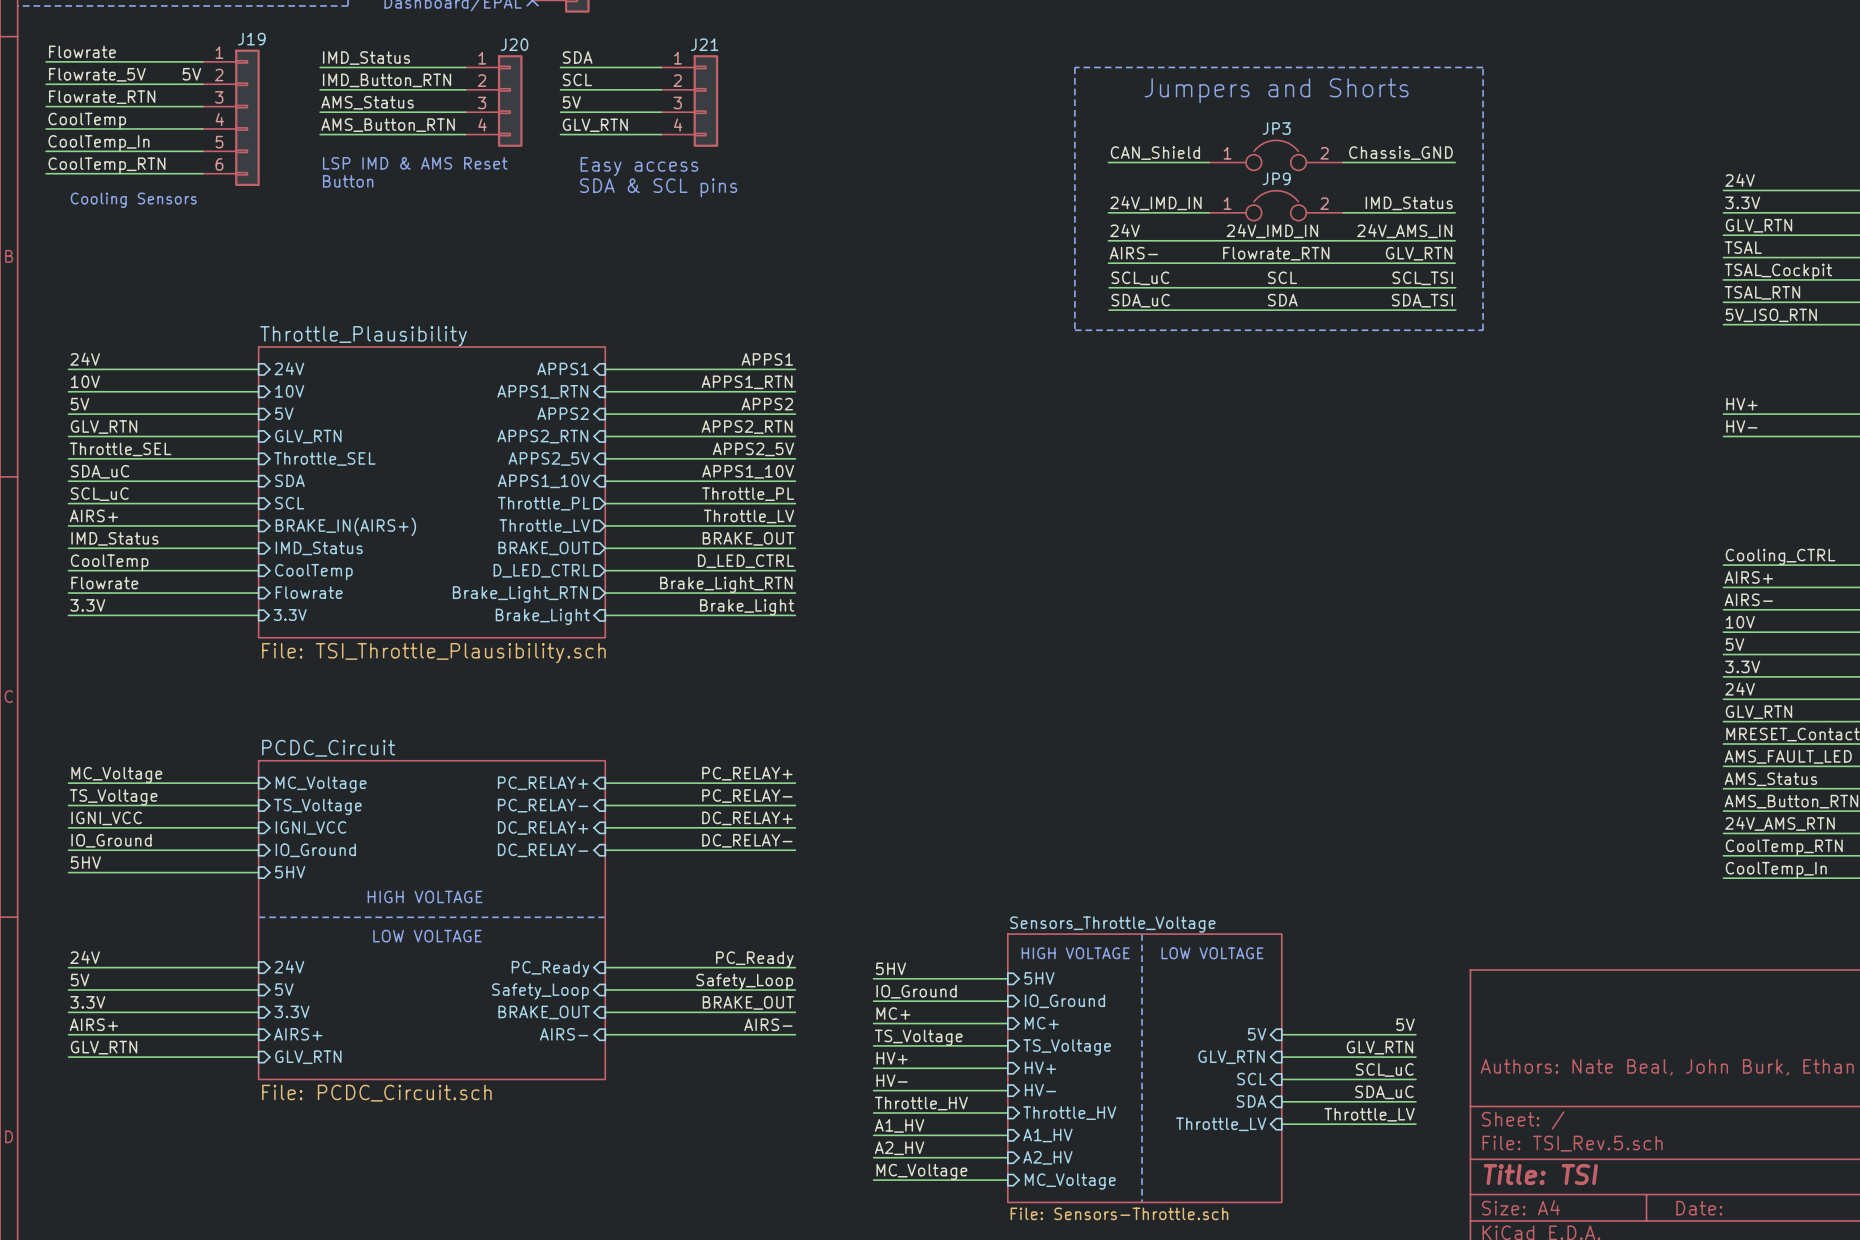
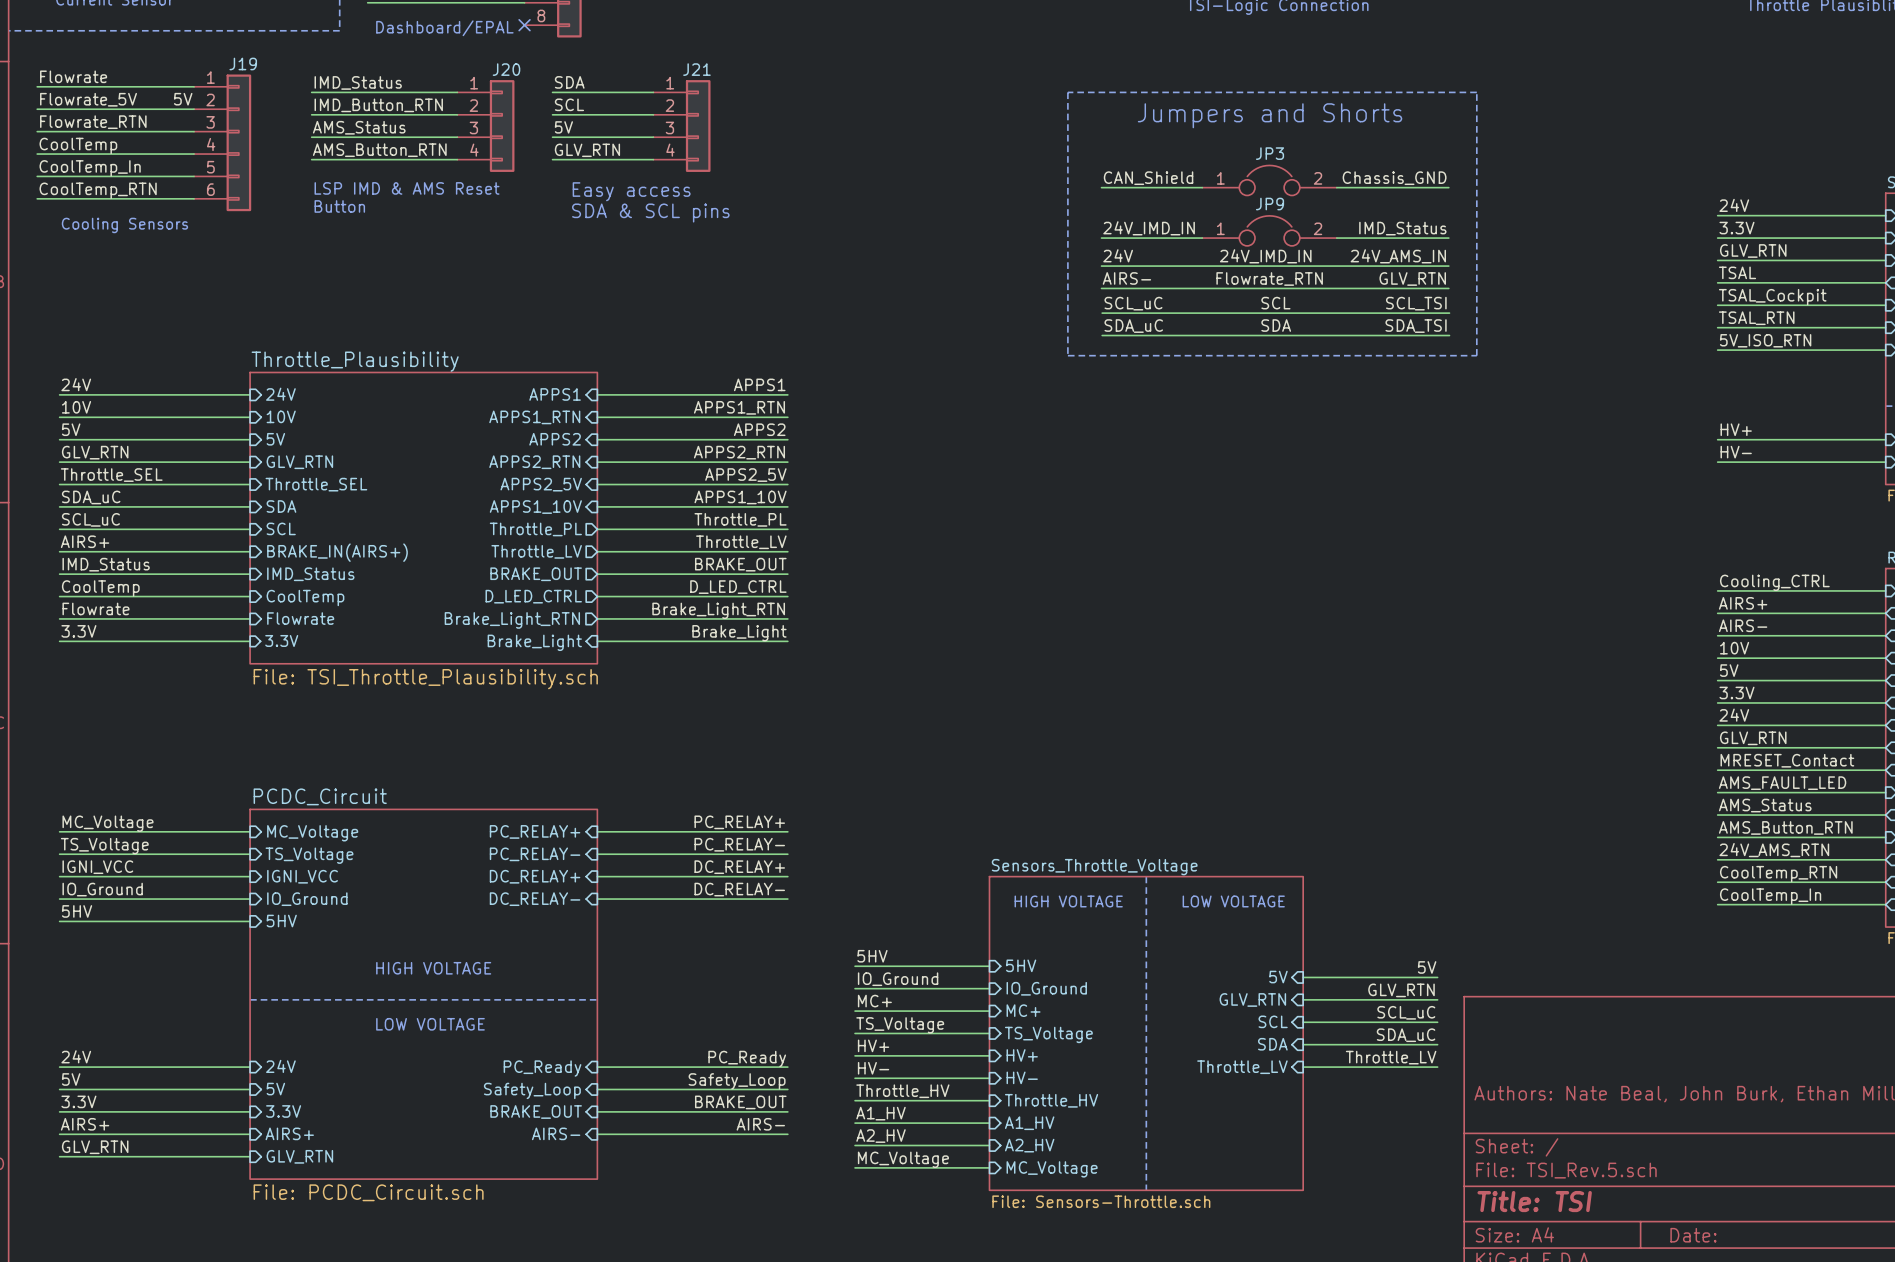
label: PC_RELAY+ (747, 773) -> none
label: MC_Voltage (116, 775) -> none
wire: (68, 783) (258, 783) -> (59, 921) (250, 921)
sheet pin: PC_RELAY+ (543, 783) -> none
wire: (605, 783) (795, 783) -> (597, 899) (787, 899)
sheet pin: MC_Voltage (321, 784) -> none
label: PC_RELAY- (747, 796) -> PC_RELAY+ (739, 822)
label: TS_Voltage (113, 797) -> MC_Voltage (107, 823)
sheet pin: PC_RELAY- (543, 805) -> PC_RELAY+ (535, 831)
sheet pin: TS_Voltage (317, 806) -> MC_Voltage (312, 833)
label: IGNI_VCC (106, 818) -> TS_Voltage (104, 846)
label: DC_RELAY+ (747, 818) -> PC_RELAY- (739, 844)
sheet pin: IGNI_VCC (310, 827) -> TS_Voltage (309, 855)
sheet pin: DC_RELAY+ (543, 827) -> PC_RELAY- (535, 854)
label: IO_Ground (111, 840) -> IGNI_VCC (97, 867)
label: DC_RELAY- (747, 840) -> DC_RELAY+ (739, 867)
sheet pin: IO_Ground (315, 850) -> IGNI_VCC (302, 876)
sheet pin: DC_RELAY- (543, 850) -> DC_RELAY+ (535, 876)
line: none -> (1146, 876) (1146, 1190)
label: 5HV (85, 862) -> IO_Ground (102, 889)
label: none -> DC_RELAY- (739, 889)
sheet pin: 5HV (290, 872) -> IO_Ground (307, 899)
sheet pin: none -> DC_RELAY- (535, 899)
label: none -> 5HV (77, 911)
sheet pin: none -> 5HV (281, 921)
text position: HIGH VOLTAGE (425, 896) -> HIGH VOLTAGE (433, 968)
line: (258, 917) (605, 917) -> (250, 999) (597, 999)
sheet PCDC_Circuit: File: PCDC_Circuit.sch (431, 920) -> none
line: (1142, 934) (1142, 1202) -> none
text position: LOW VOLTAGE (427, 936) -> LOW VOLTAGE (430, 1024)
text position: HIGH VOLTAGE (1075, 953) -> HIGH VOLTAGE (1068, 901)
text position: LOW VOLTAGE (1212, 953) -> LOW VOLTAGE (1233, 901)
label position: 24V (85, 957) -> 24V (76, 1056)
label position: PC_Ready (754, 959) -> PC_Ready (747, 1058)
sheet pin position: 24V (289, 966) -> 24V (280, 1066)
wire: (68, 967) (258, 967) -> (59, 1067) (250, 1067)
sheet PCDC_Circuit: none -> File: PCDC_Circuit.sch (423, 994)
wire: (605, 967) (795, 967) -> (597, 1067) (787, 1067)
label position: 5HV (891, 968) -> 5HV (872, 956)
sheet pin position: PC_Ready (550, 969) -> PC_Ready (542, 1068)
wire: (873, 978) (1007, 978) -> (855, 966) (989, 966)
sheet pin position: 5HV (1039, 978) -> 5HV (1021, 965)
label position: 5V (80, 980) -> 5V (71, 1079)
label position: Safety_Loop (744, 981) -> Safety_Loop (737, 1081)
wire: (68, 989) (258, 989) -> (59, 1089) (250, 1089)
sheet pin position: 5V (284, 989) -> 5V (275, 1089)
wire: (605, 989) (795, 989) -> (597, 1089) (787, 1089)
sheet pin position: Safety_Loop (540, 991) -> Safety_Loop (532, 1090)
label position: IO_Ground (916, 991) -> IO_Ground (898, 979)
wire: (873, 1001) (1007, 1001) -> (855, 988) (989, 988)
sheet pin position: IO_Ground (1064, 1001) -> IO_Ground (1046, 988)
label position: 3.3V (87, 1002) -> 3.3V (78, 1101)
label position: BRAKE_OUT (748, 1002) -> BRAKE_OUT (740, 1102)
sheet Sensors_Throttle_Voltage: none -> File: Sensors-Throttle.sch (1146, 1033)
sheet pin position: 3.3V (292, 1011) -> 3.3V (283, 1111)
wire: (68, 1012) (258, 1012) -> (59, 1111) (250, 1111)
sheet pin position: BRAKE_OUT (544, 1012) -> BRAKE_OUT (536, 1112)
wire: (605, 1012) (795, 1012) -> (597, 1111) (787, 1111)
label position: MC+ (893, 1013) -> MC+ (874, 1001)
wire: (873, 1023) (1007, 1023) -> (855, 1011) (989, 1011)
sheet pin position: MC+ (1041, 1023) -> MC+ (1023, 1010)
label position: AIRS+ (93, 1024) -> AIRS+ (85, 1124)
label position: AIRS- (768, 1024) -> AIRS- (760, 1124)
label position: 5V (1405, 1024) -> 5V (1427, 967)
wire: (68, 1034) (258, 1034) -> (59, 1134) (250, 1134)
sheet pin position: AIRS+ (298, 1034) -> AIRS+ (289, 1133)
sheet pin position: AIRS- (564, 1034) -> AIRS- (556, 1133)
wire: (605, 1034) (795, 1034) -> (597, 1134) (787, 1134)
sheet pin position: 5V (1257, 1034) -> 5V (1278, 977)
wire: (1281, 1034) (1415, 1034) -> (1303, 977) (1437, 977)
label position: TS_Voltage (918, 1037) -> TS_Voltage (900, 1025)
wire: (873, 1045) (1007, 1045) -> (855, 1033) (989, 1033)
label position: GLV_RTN (104, 1047) -> GLV_RTN (95, 1147)
sheet pin position: TS_Voltage (1067, 1047) -> TS_Voltage (1048, 1034)
label position: GLV_RTN (1379, 1047) -> GLV_RTN (1401, 990)
wire: (68, 1057) (258, 1057) -> (59, 1156) (250, 1156)
sheet pin position: GLV_RTN (308, 1057) -> GLV_RTN (299, 1156)
sheet pin position: GLV_RTN (1231, 1057) -> GLV_RTN (1252, 999)
wire: (1281, 1057) (1415, 1057) -> (1303, 999) (1437, 999)
label position: HV+ (892, 1058) -> HV+ (873, 1045)
sheet pin position: HV+ (1040, 1067) -> HV+ (1022, 1055)
wire: (873, 1068) (1007, 1068) -> (855, 1055) (989, 1055)
sheet Sensors_Throttle_Voltage: File: Sensors-Throttle.sch (1144, 1068) -> none
label position: SCL_uC (1384, 1070) -> SCL_uC (1406, 1012)
sheet pin position: SCL (1251, 1079) -> SCL (1273, 1021)
wire: (1281, 1079) (1415, 1079) -> (1303, 1022) (1437, 1022)
label position: HV- (892, 1080) -> HV- (873, 1068)
wire: (873, 1090) (1007, 1090) -> (855, 1078) (989, 1078)
sheet pin position: HV- (1040, 1090) -> HV- (1022, 1077)
label position: SDA_uC (1384, 1092) -> SDA_uC (1406, 1035)
sheet pin position: SDA (1251, 1101) -> SDA (1272, 1044)
wire: (1281, 1101) (1415, 1101) -> (1303, 1044) (1437, 1044)
label position: Throttle_HV (921, 1103) -> Throttle_HV (902, 1091)
wire: (873, 1112) (1007, 1112) -> (855, 1100) (989, 1100)
sheet pin position: Throttle_HV (1069, 1113) -> Throttle_HV (1051, 1100)
label position: Throttle_LV (1369, 1114) -> Throttle_LV (1391, 1057)
sheet pin position: Throttle_LV (1221, 1124) -> Throttle_LV (1242, 1067)
wire: (1281, 1124) (1415, 1124) -> (1303, 1067) (1437, 1067)
label position: A1_HV (899, 1125) -> A1_HV (881, 1113)
wire: (873, 1135) (1007, 1135) -> (855, 1123) (989, 1123)
sheet pin position: A1_HV (1047, 1135) -> A1_HV (1029, 1123)
label position: A2_HV (899, 1148) -> A2_HV (881, 1136)
wire: (873, 1157) (1007, 1157) -> (855, 1145) (989, 1145)
sheet pin position: A2_HV (1047, 1157) -> A2_HV (1029, 1145)
label position: MC_Voltage (921, 1171) -> MC_Voltage (903, 1159)
wire: (873, 1180) (1007, 1180) -> (855, 1167) (989, 1167)
sheet pin position: MC_Voltage (1070, 1181) -> MC_Voltage (1052, 1169)

